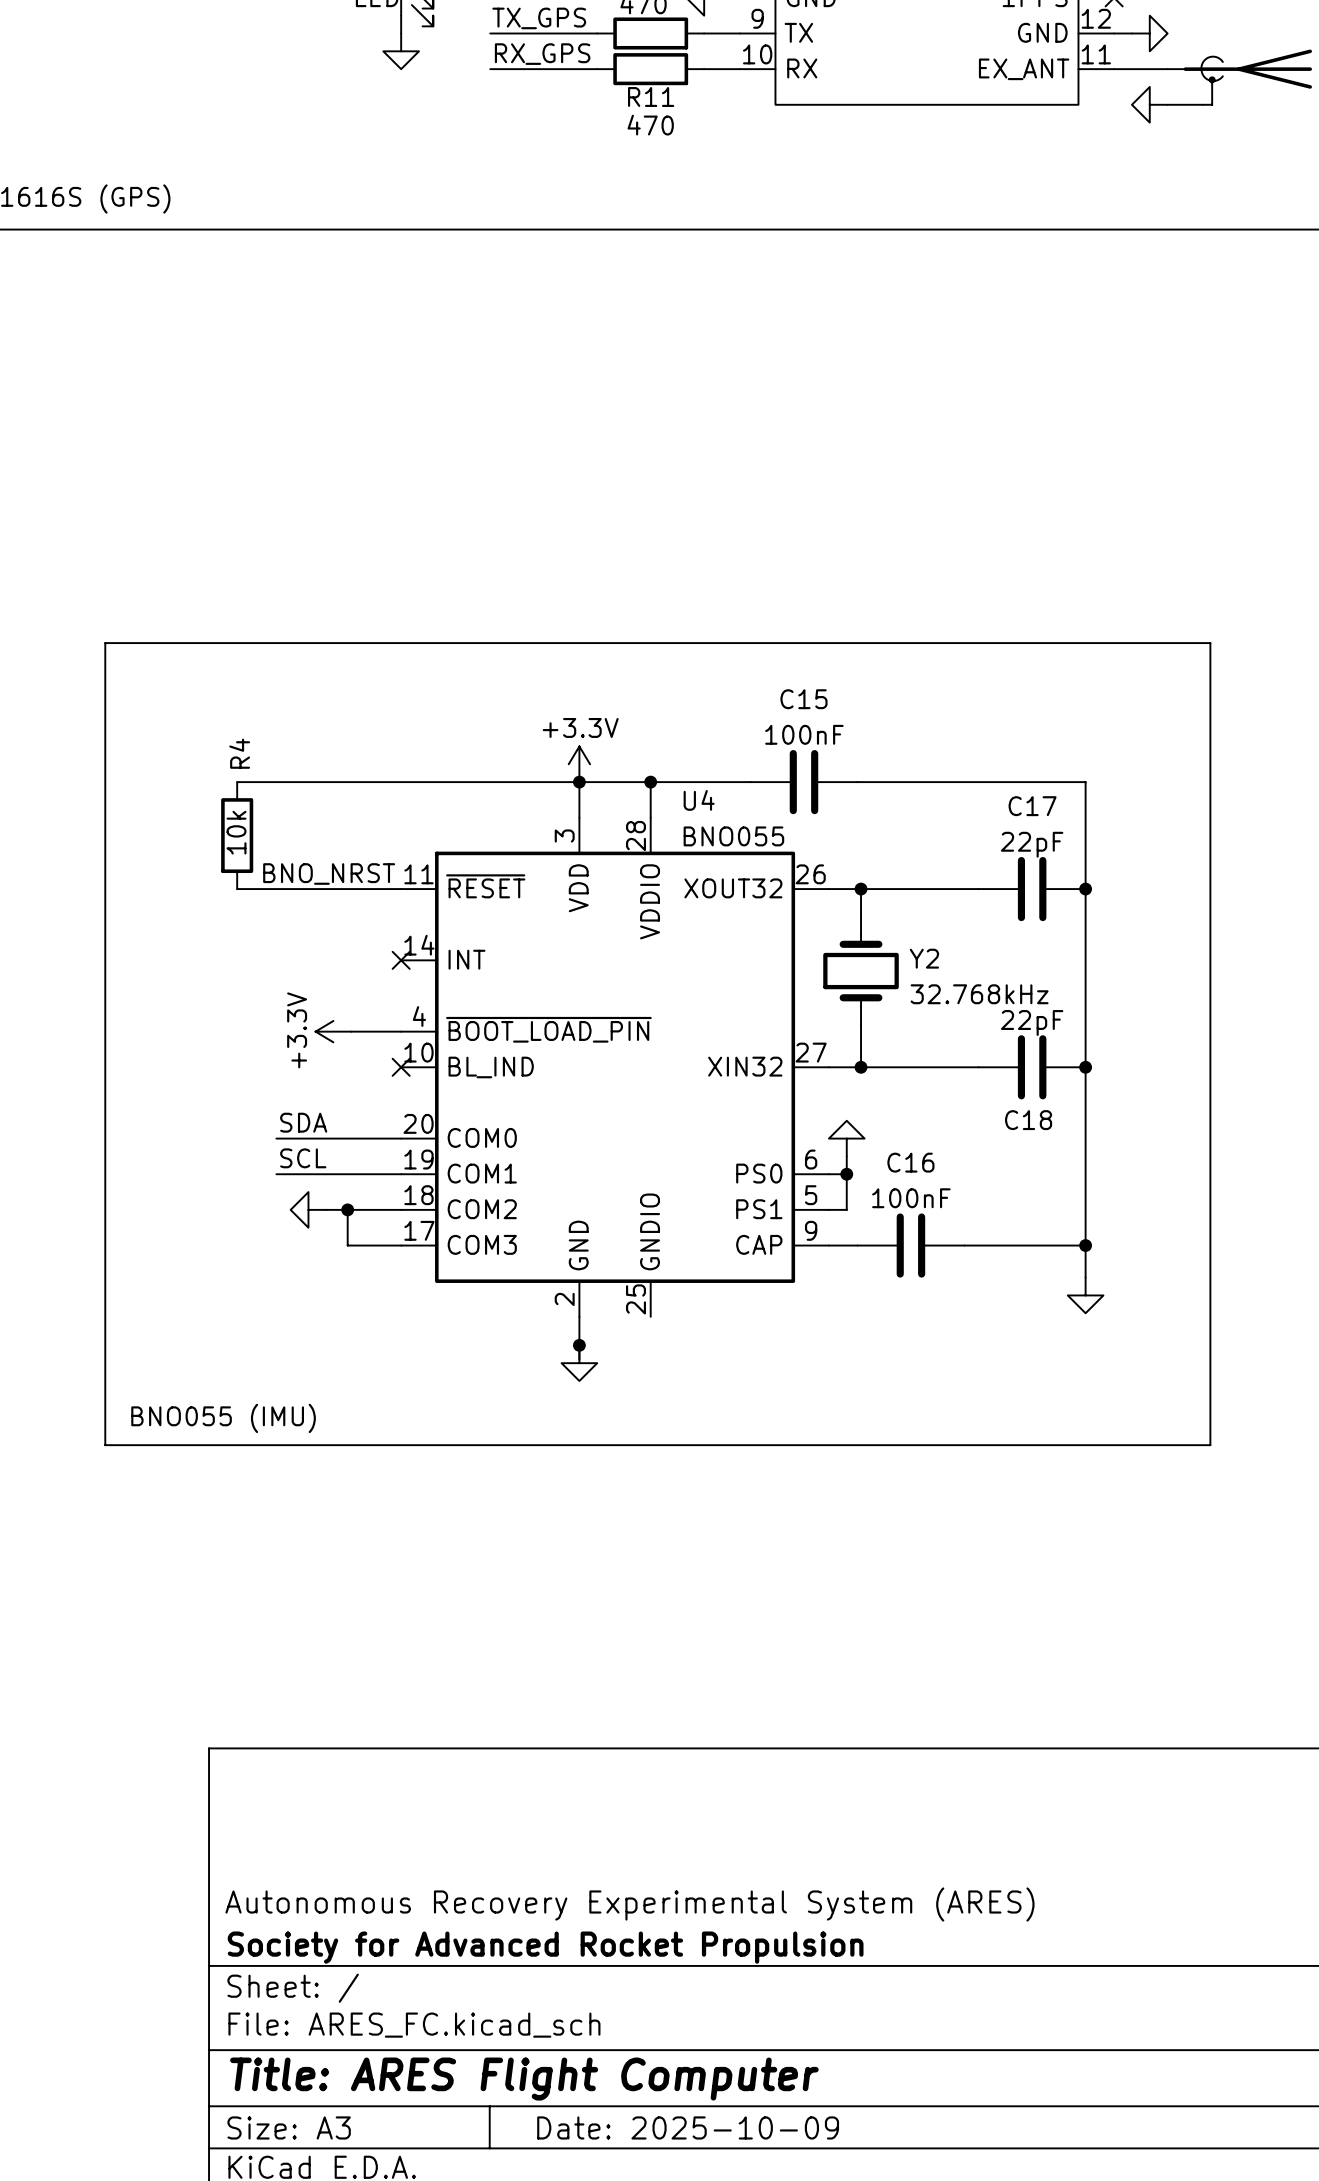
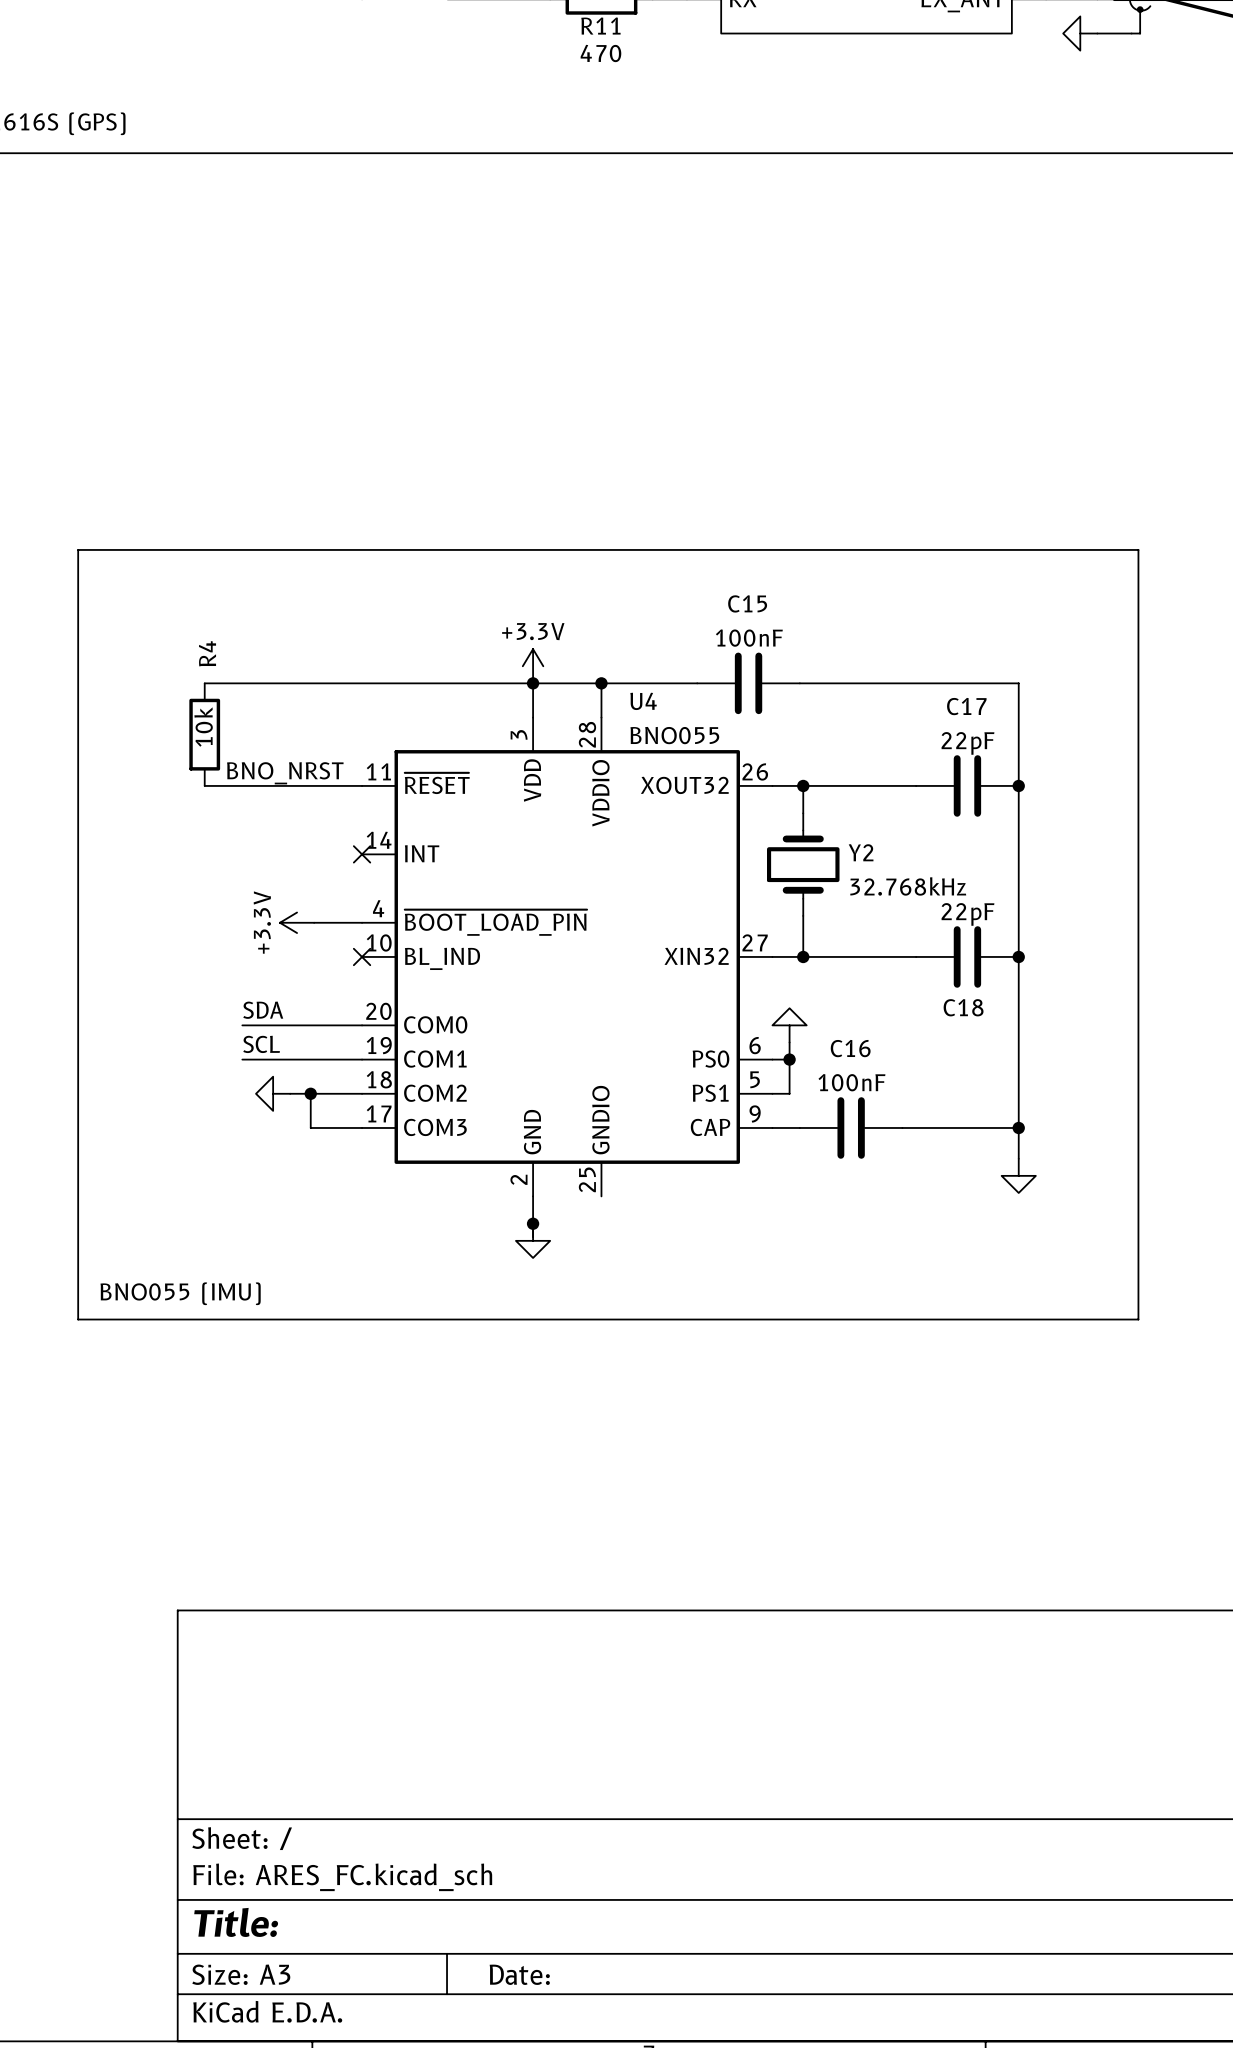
title block: Autonomous Recovery Experimental System (ARES) (629, 1904) -> none
title block: Society for Advanced Rocket Propulsion (545, 1947) -> none
title block: Title: ARES Flight Computer (524, 2079) -> Title: (236, 1922)
title block: Date: 2025-10-09 (688, 2127) -> Date: (519, 1974)

